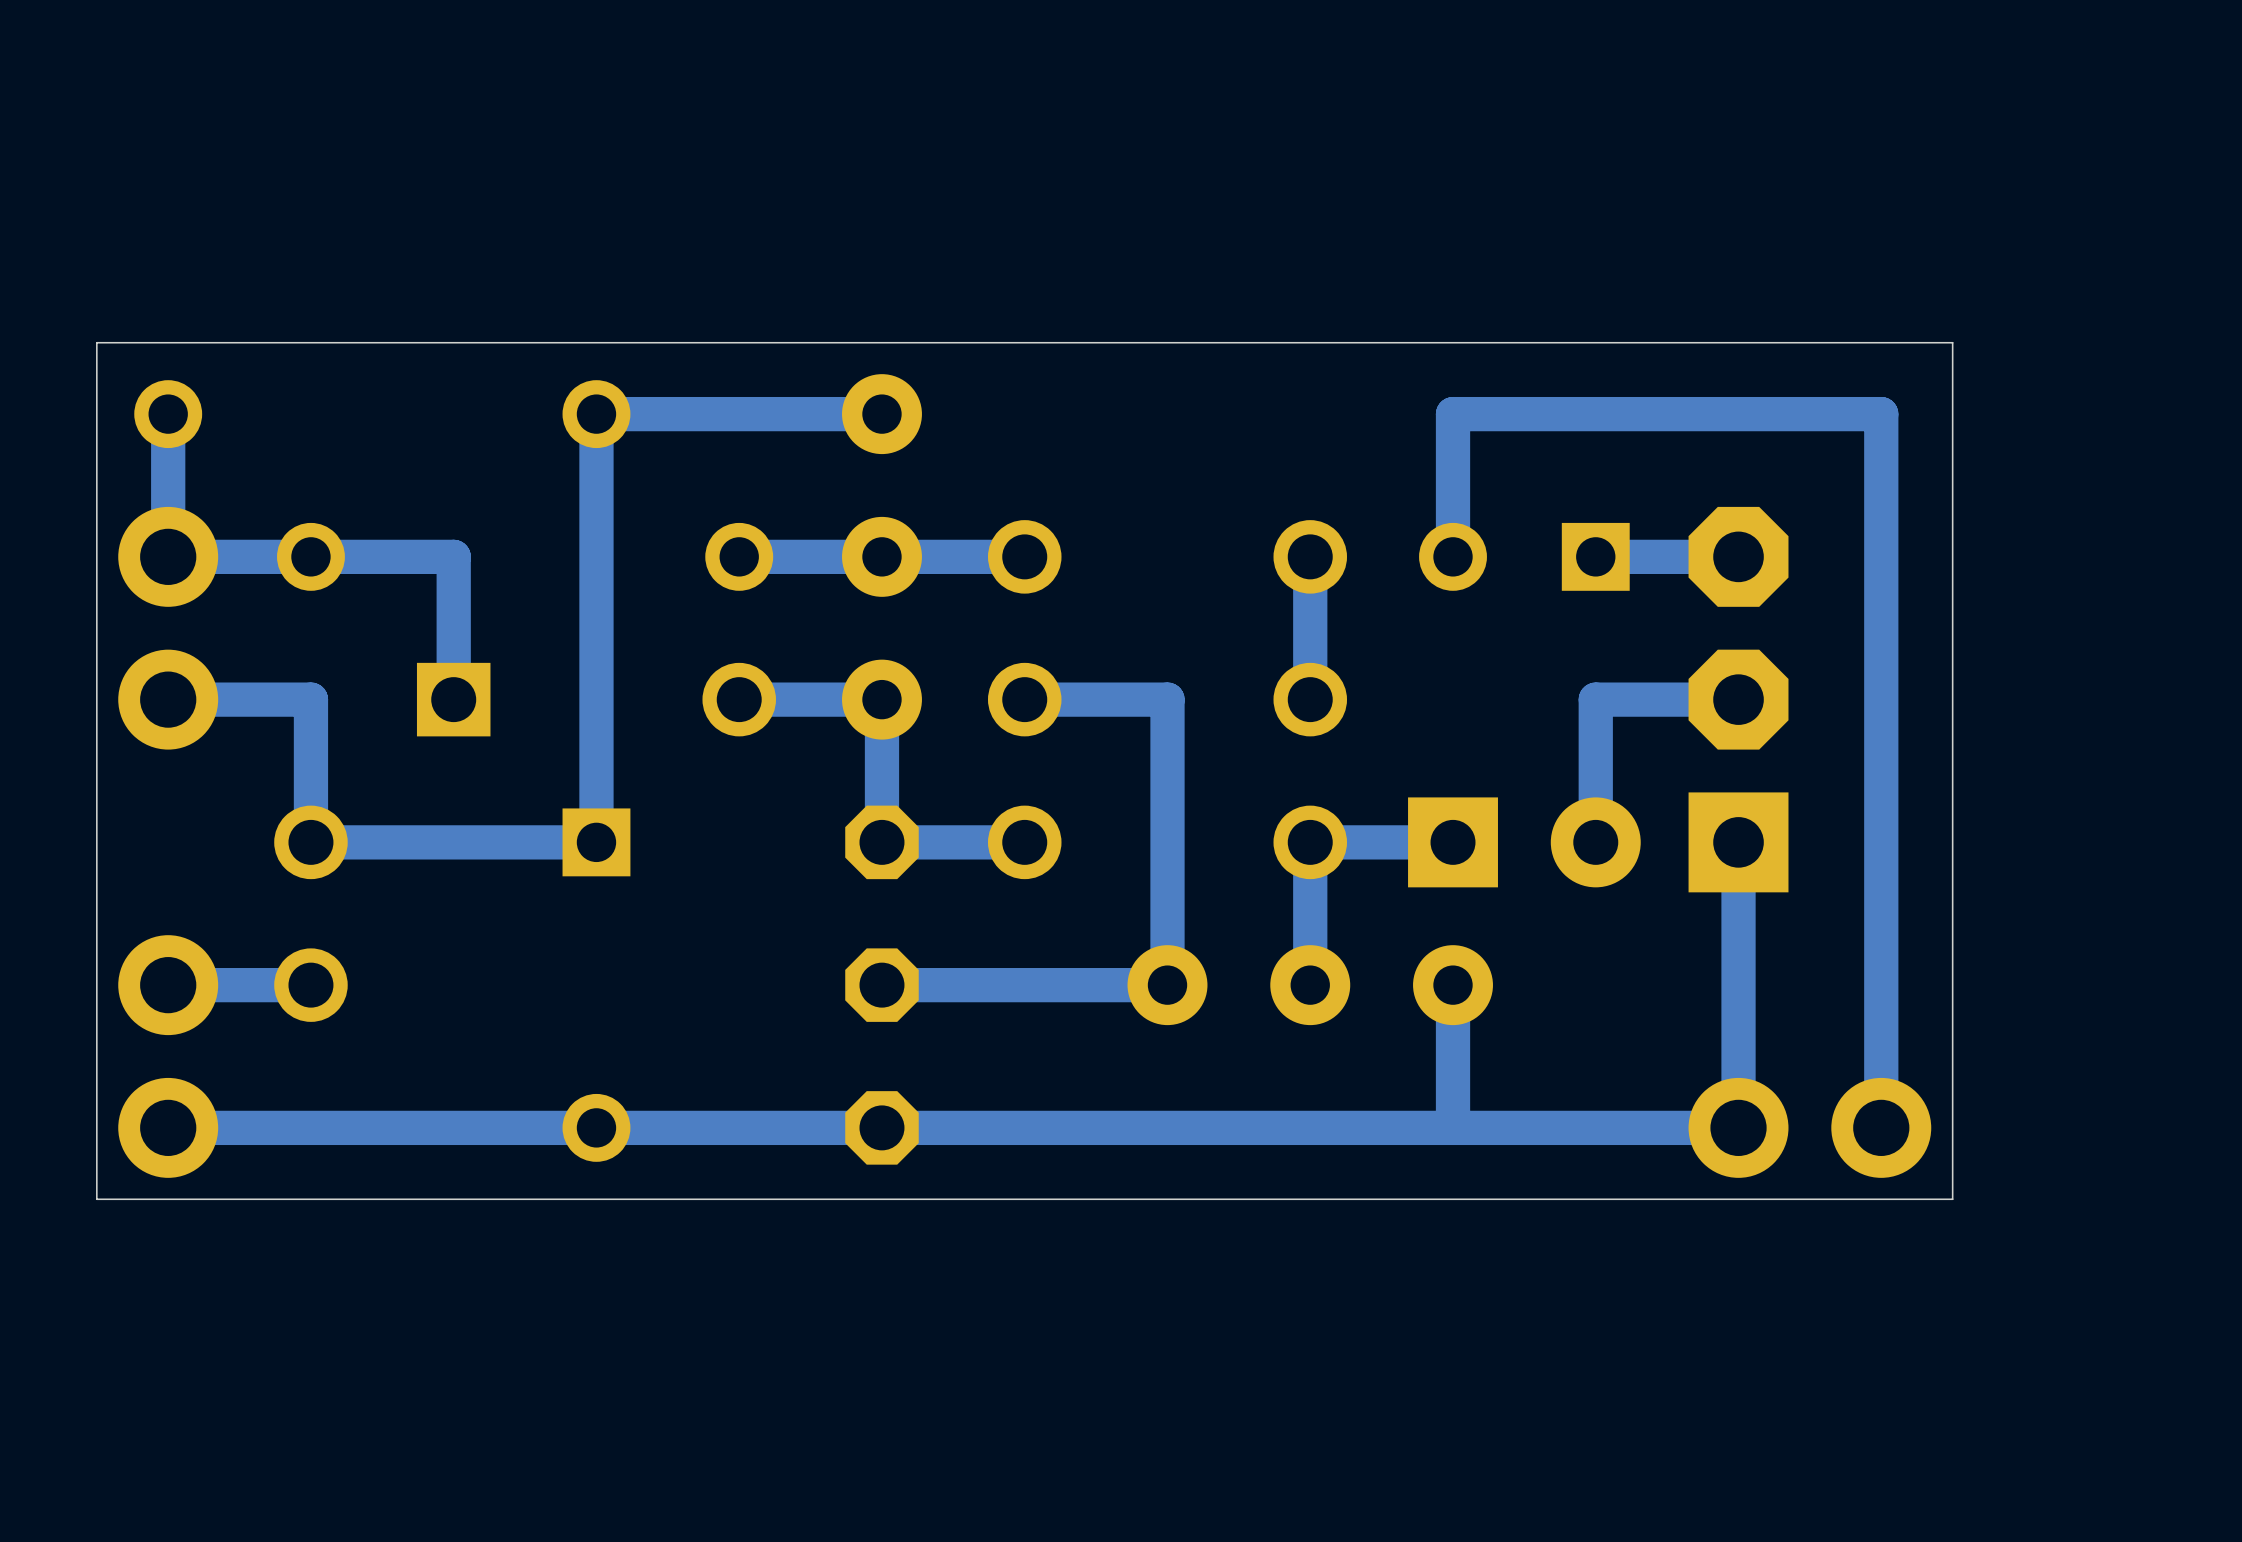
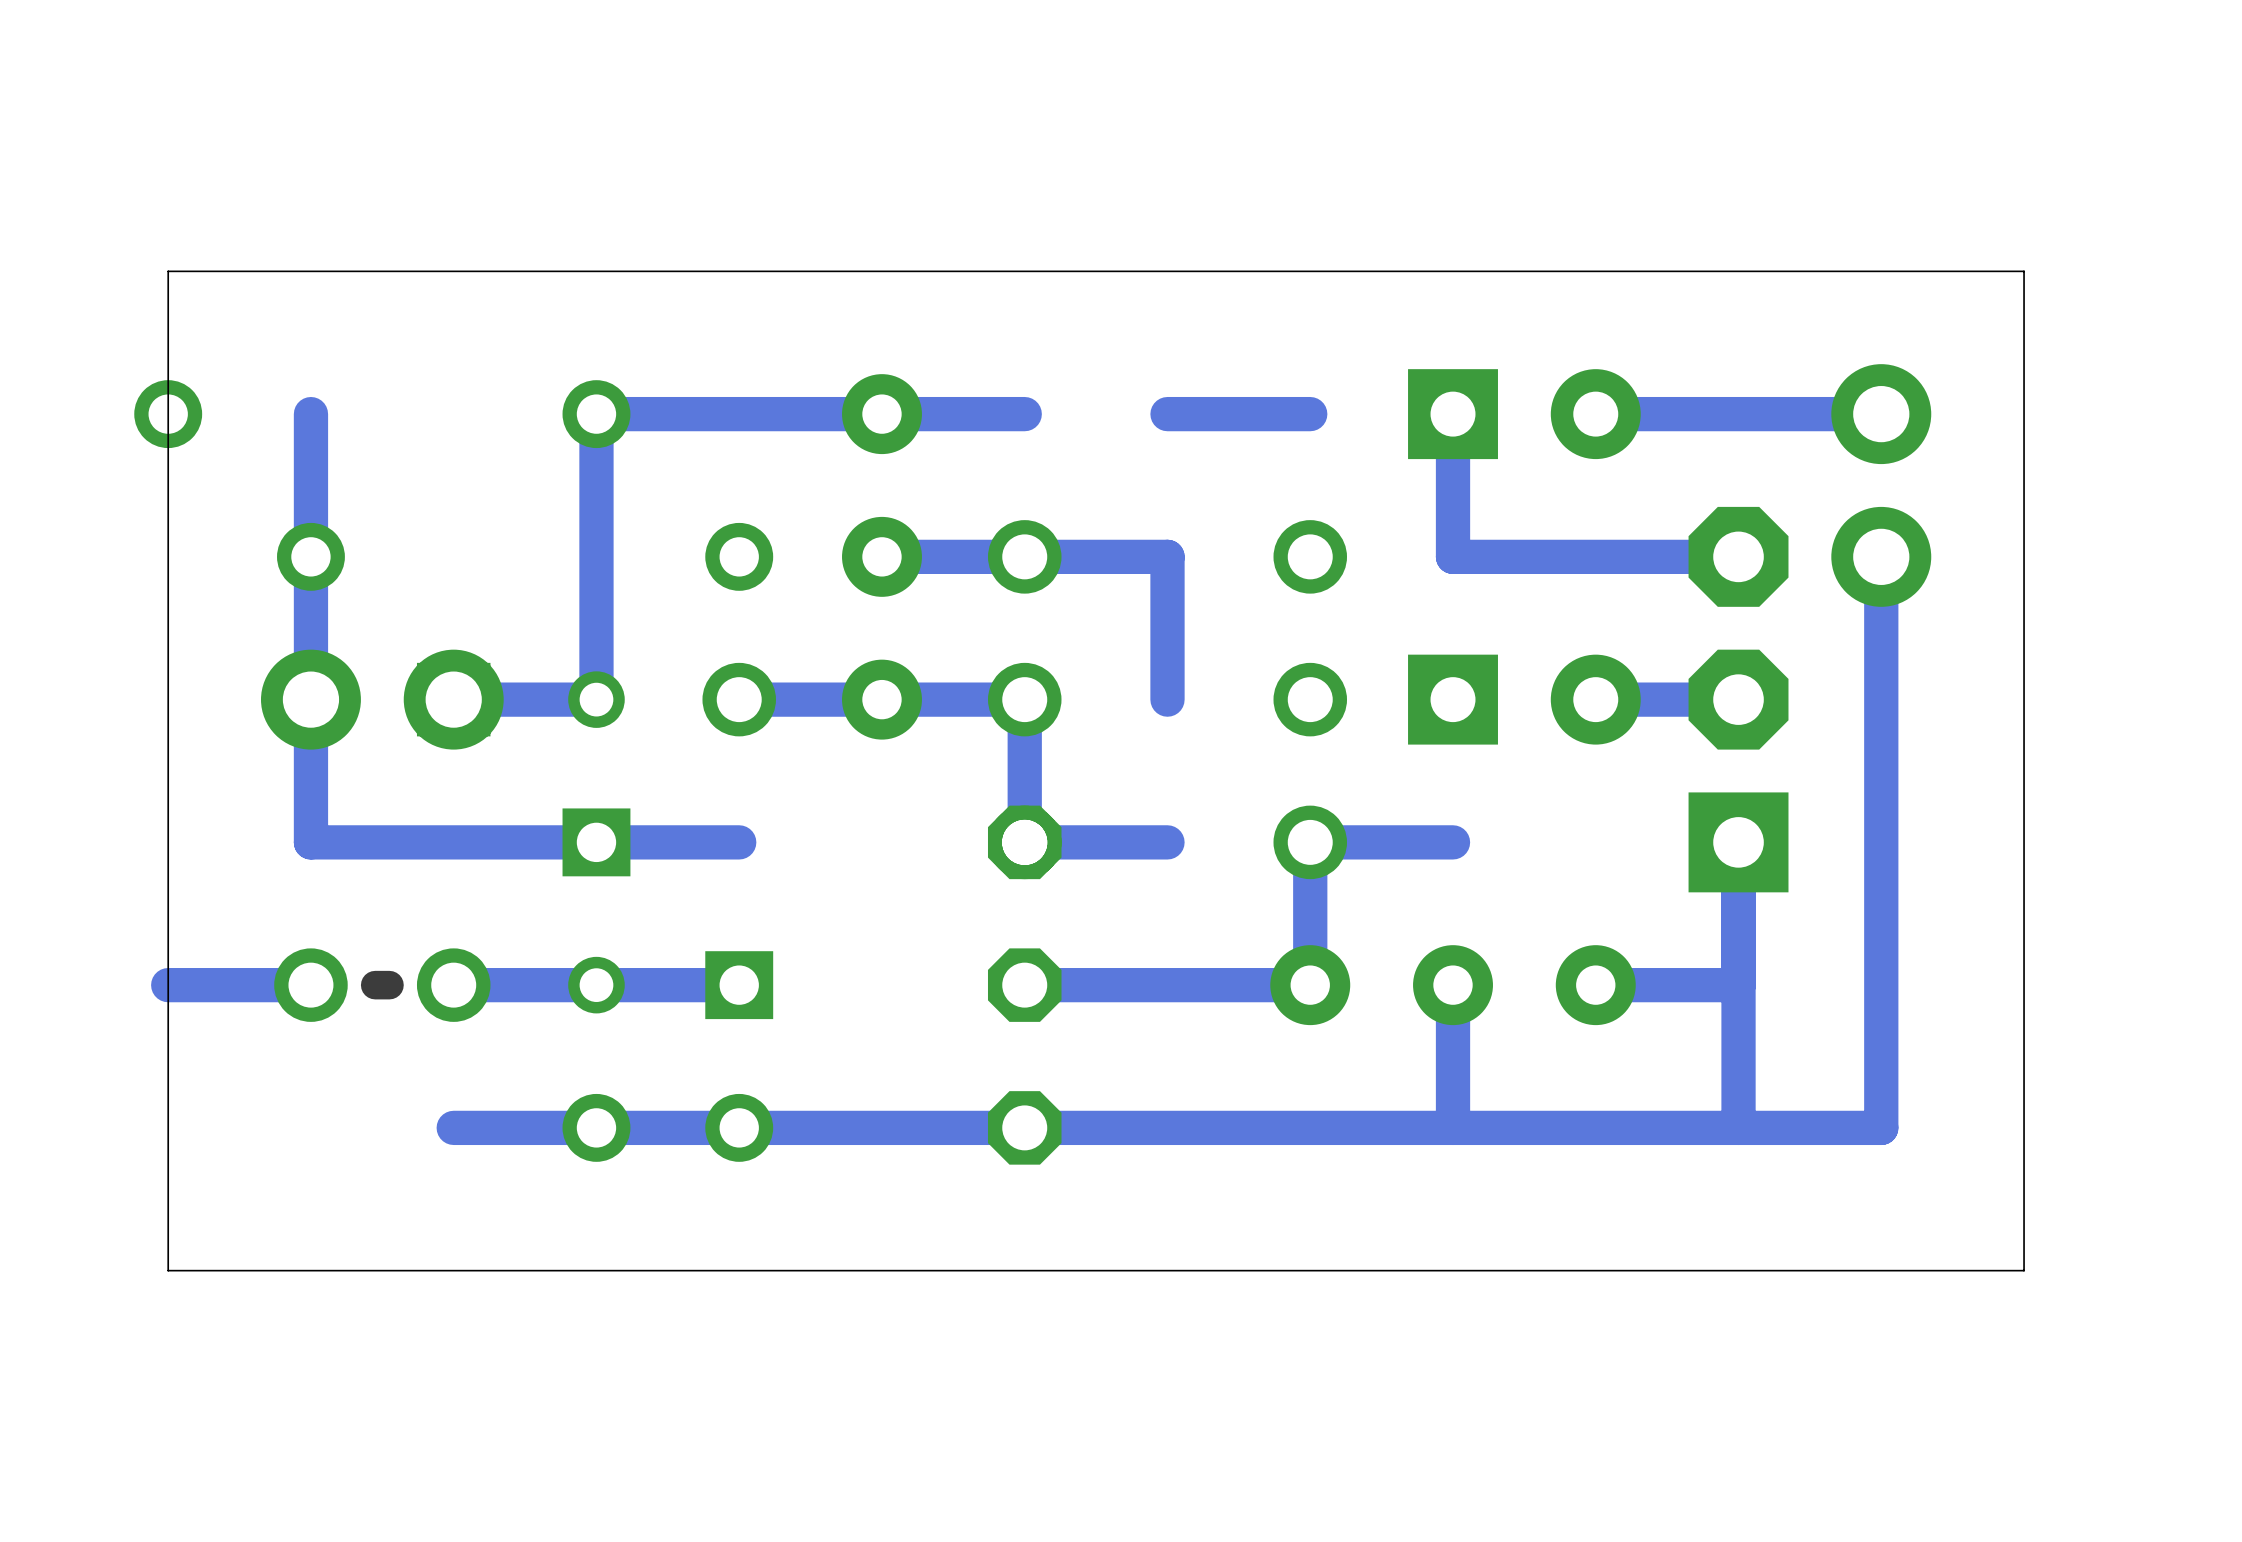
board edge: (1952, 342) (96, 342) (96, 1199) (1952, 1199) (1952, 342) -> (2024, 271) (2024, 1270) (168, 1270) (168, 271) (2024, 271)
track: (168, 414) (168, 556) (453, 556) (453, 699) -> (596, 699) (453, 699)
track: none -> (1024, 414) (881, 414)
part: none -> (1524, 414)
track: (1595, 414) (1453, 414) -> (1310, 414) (1167, 414)
track: (1881, 414) (1881, 556) -> none
track: (881, 556) (739, 556) -> (1595, 556) (1453, 556)
track: none -> (1024, 556) (1167, 556) (1167, 699)
track: (1310, 556) (1310, 699) -> none
part rotation: 0° (1524, 556) -> 90° counterclockwise (739, 1056)
part position: (1524, 556) -> (739, 1056)
part: (168, 628) -> none
track: (310, 699) (168, 699) -> (310, 699) (310, 414)
part: none -> (382, 699)
track: (596, 699) (596, 842) -> (739, 842) (596, 842)
via: none -> (596, 699)
track: (881, 699) (881, 842) (1024, 842) -> (881, 699) (1024, 699) (1024, 842) (1167, 842)
track: (1024, 699) (1167, 699) (1167, 985) -> (1310, 985) (1167, 985)
track: (1595, 699) (1595, 842) -> none
part position: (1524, 842) -> (1524, 699)
part: (310, 913) -> none
part: none -> (382, 985)
via: none -> (596, 985)
part position: (881, 985) -> (1024, 985)
track: (1024, 985) (881, 985) -> (1738, 985) (1595, 985)
part position: (1310, 985) -> (1453, 985)
part: (168, 1056) -> none
track: (453, 1127) (168, 1127) -> (739, 985) (453, 985)
part rotation: 0° (1809, 1127) -> 90° clockwise (1881, 485)
part position: (1809, 1127) -> (1881, 485)
track: none -> (1881, 1127) (1738, 1127)

